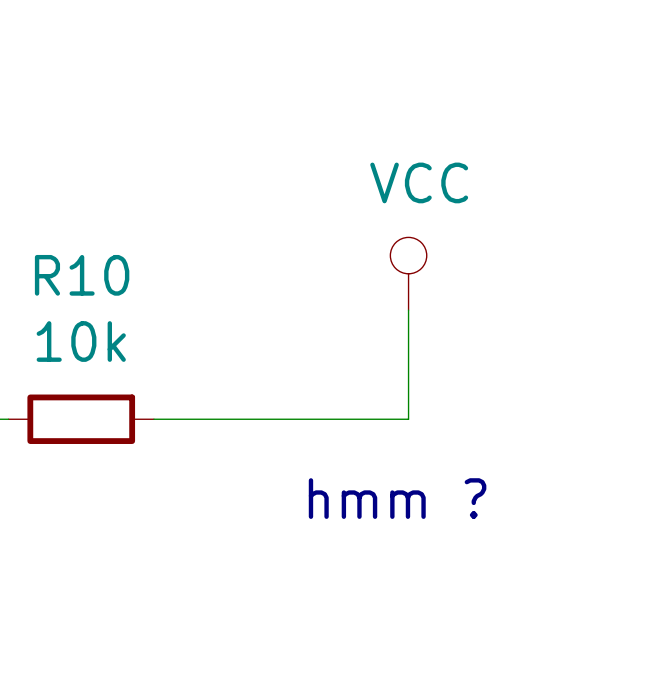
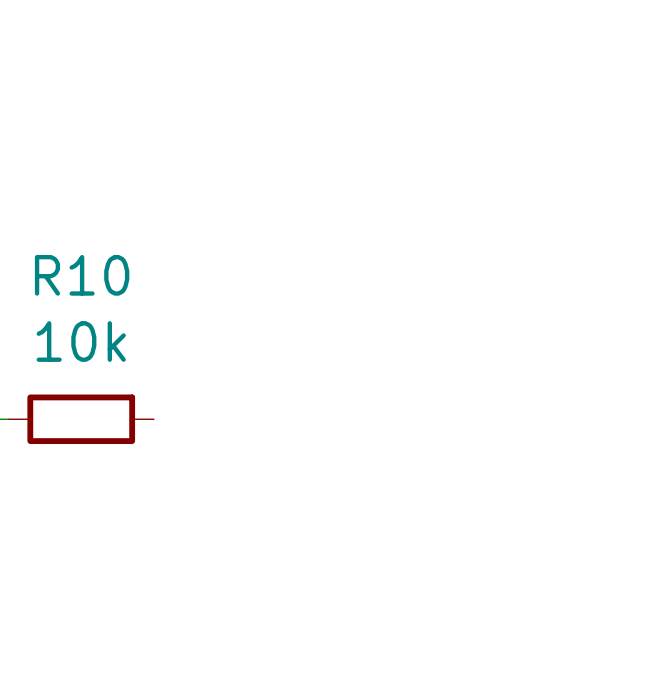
power symbol: VCC (408, 273) -> none
wire: (408, 310) (408, 419) (153, 419) -> none
text: hmm ? (397, 498) -> none

